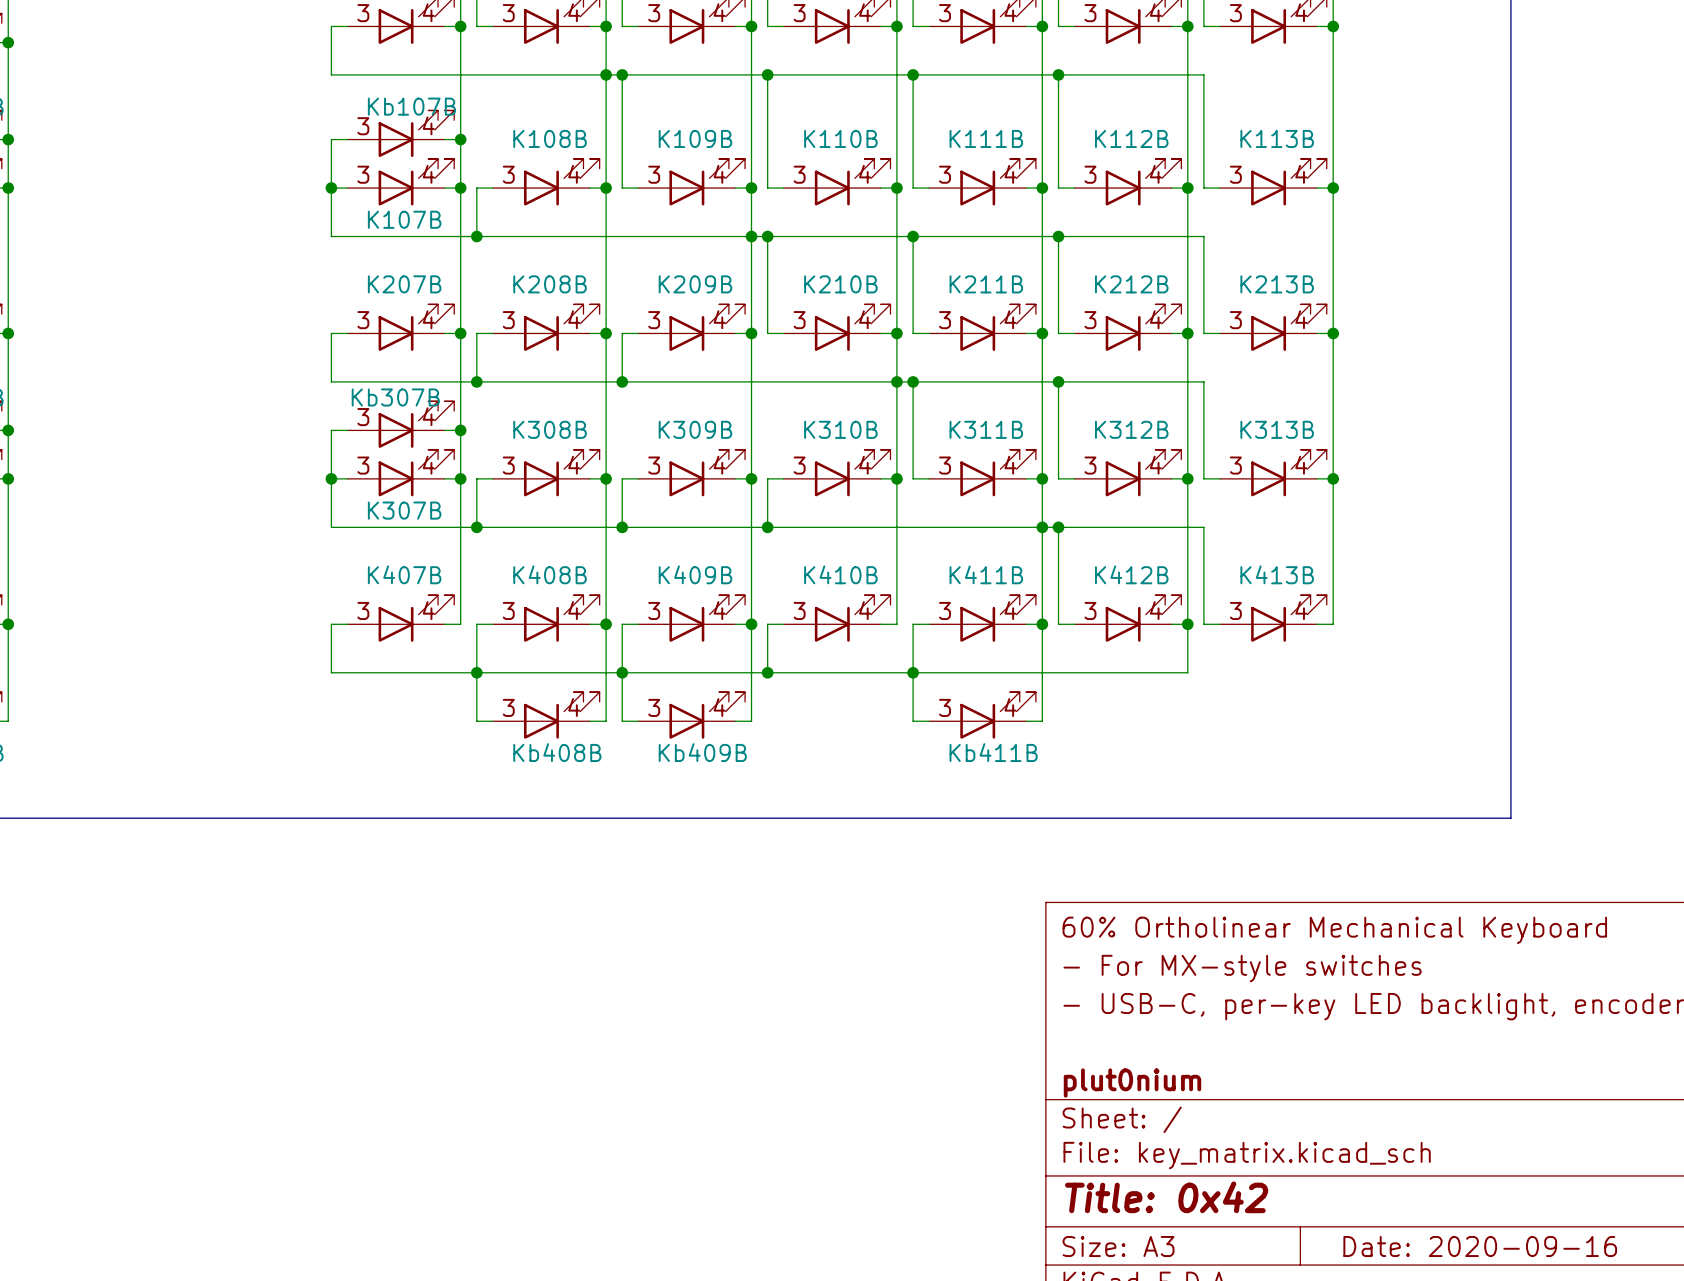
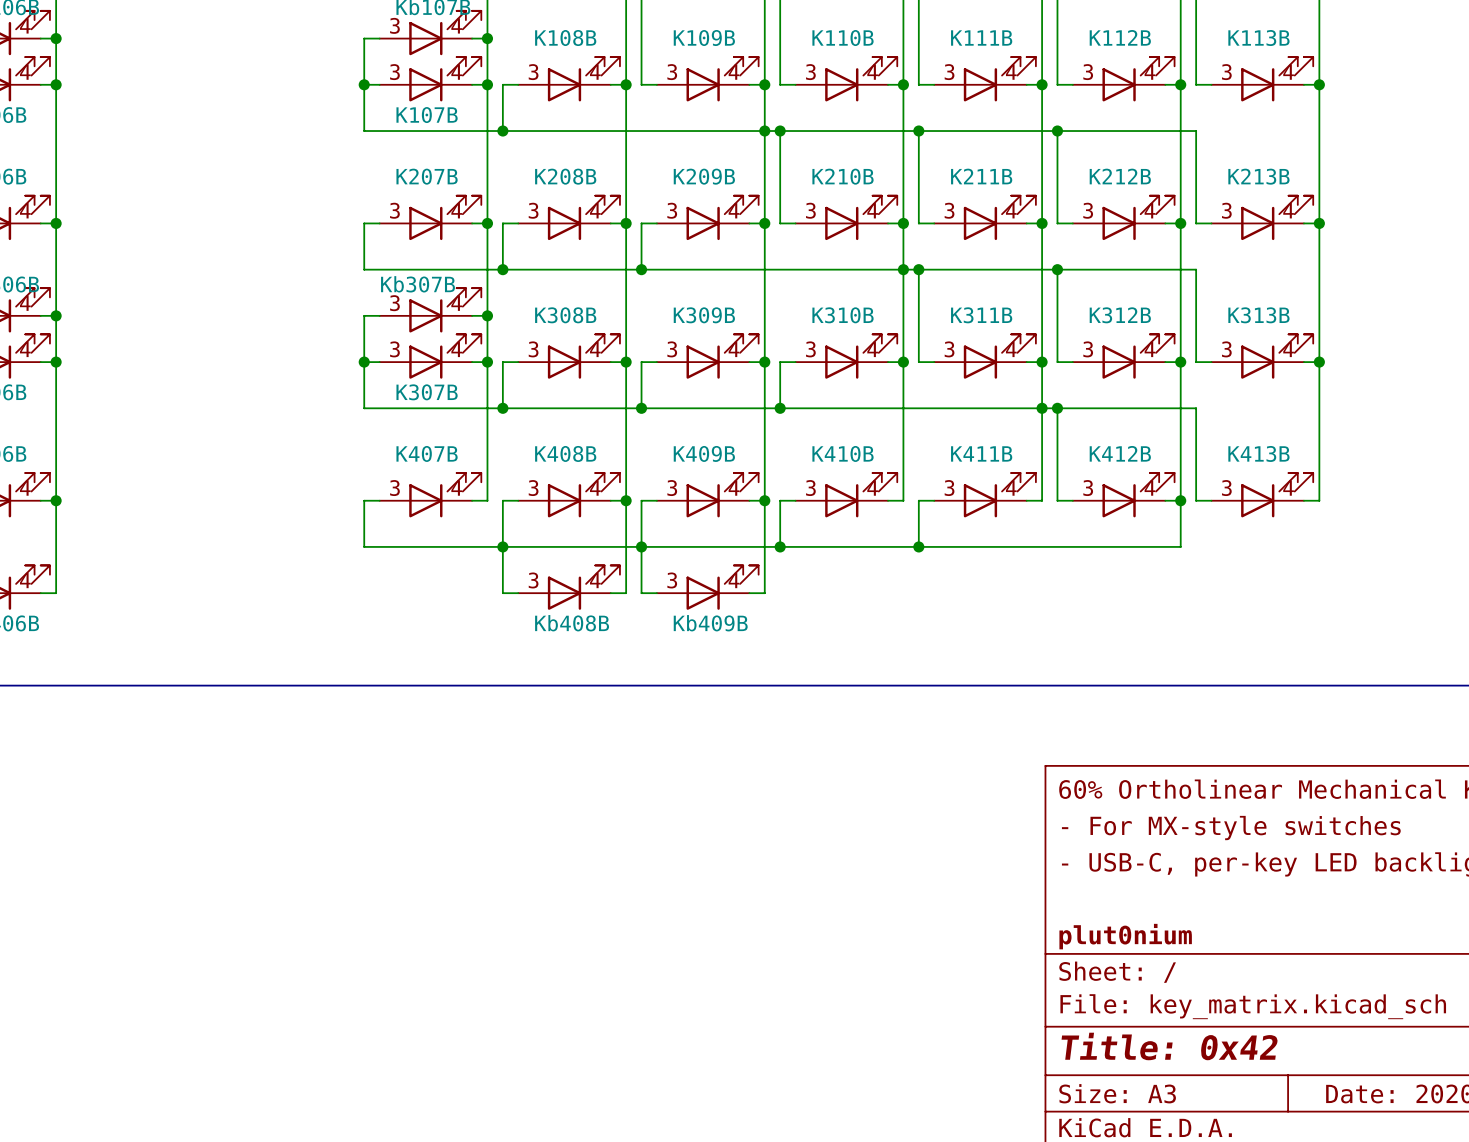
wire: (1042, 624) (1042, 721) (1026, 721) -> none
junction: (1042, 624) -> none
wire: (913, 672) (913, 721) (929, 721) -> none
Kb411B: (982, 715) -> none

